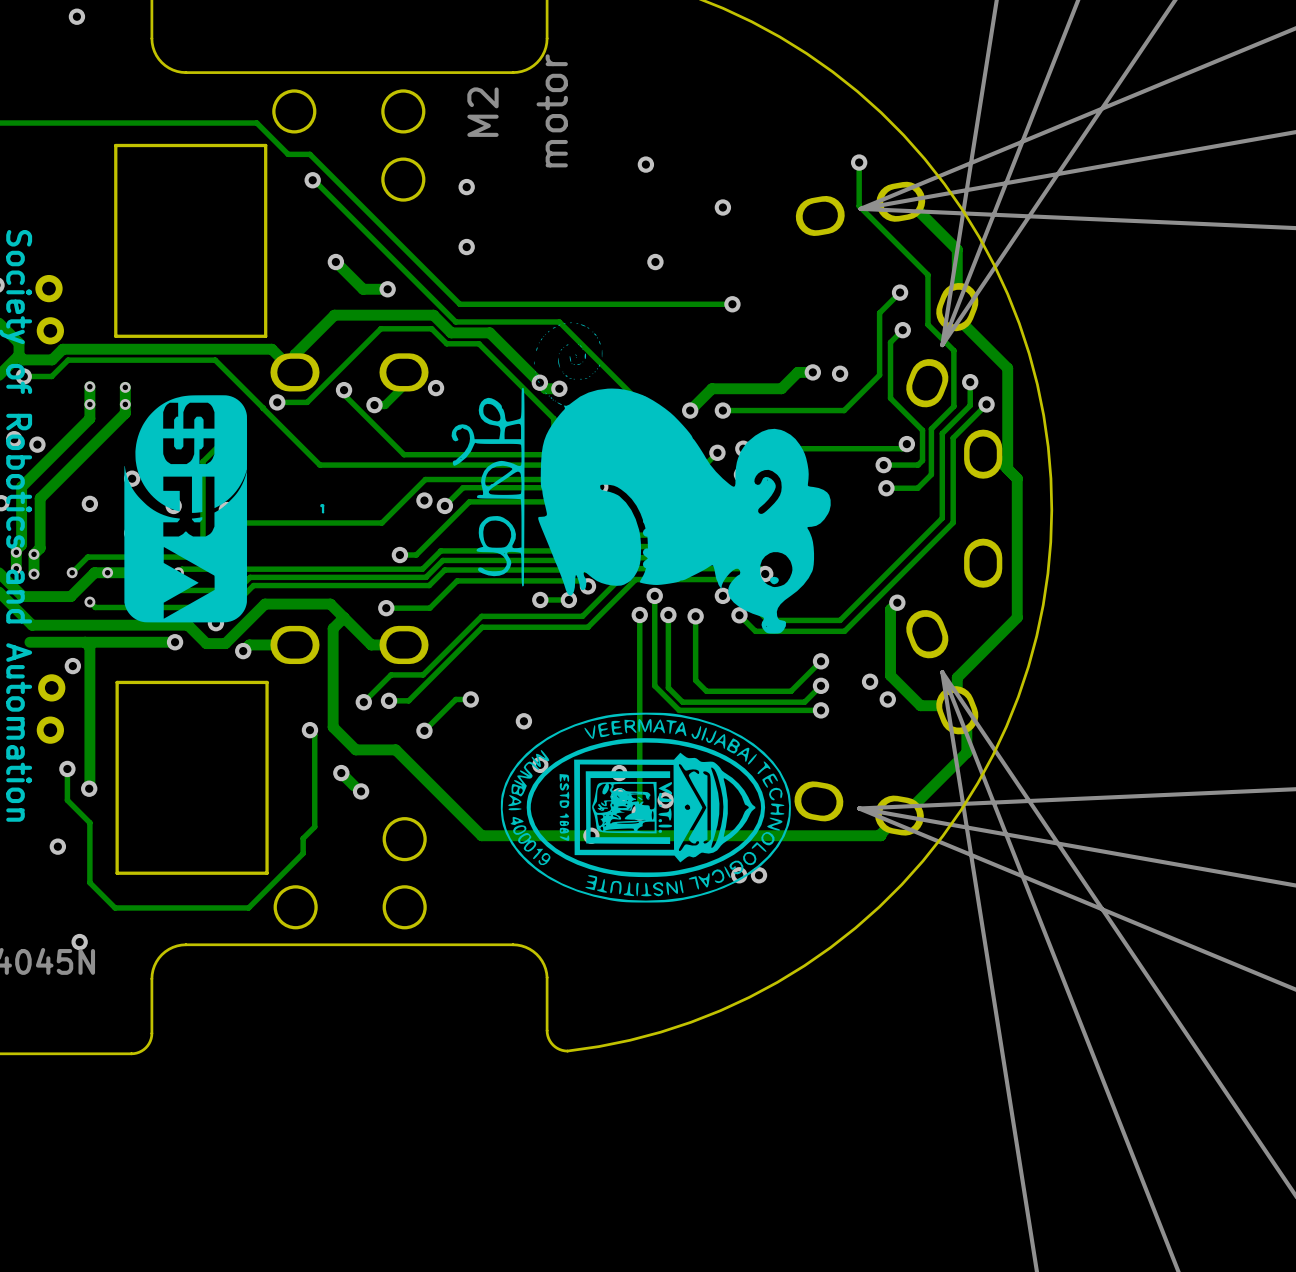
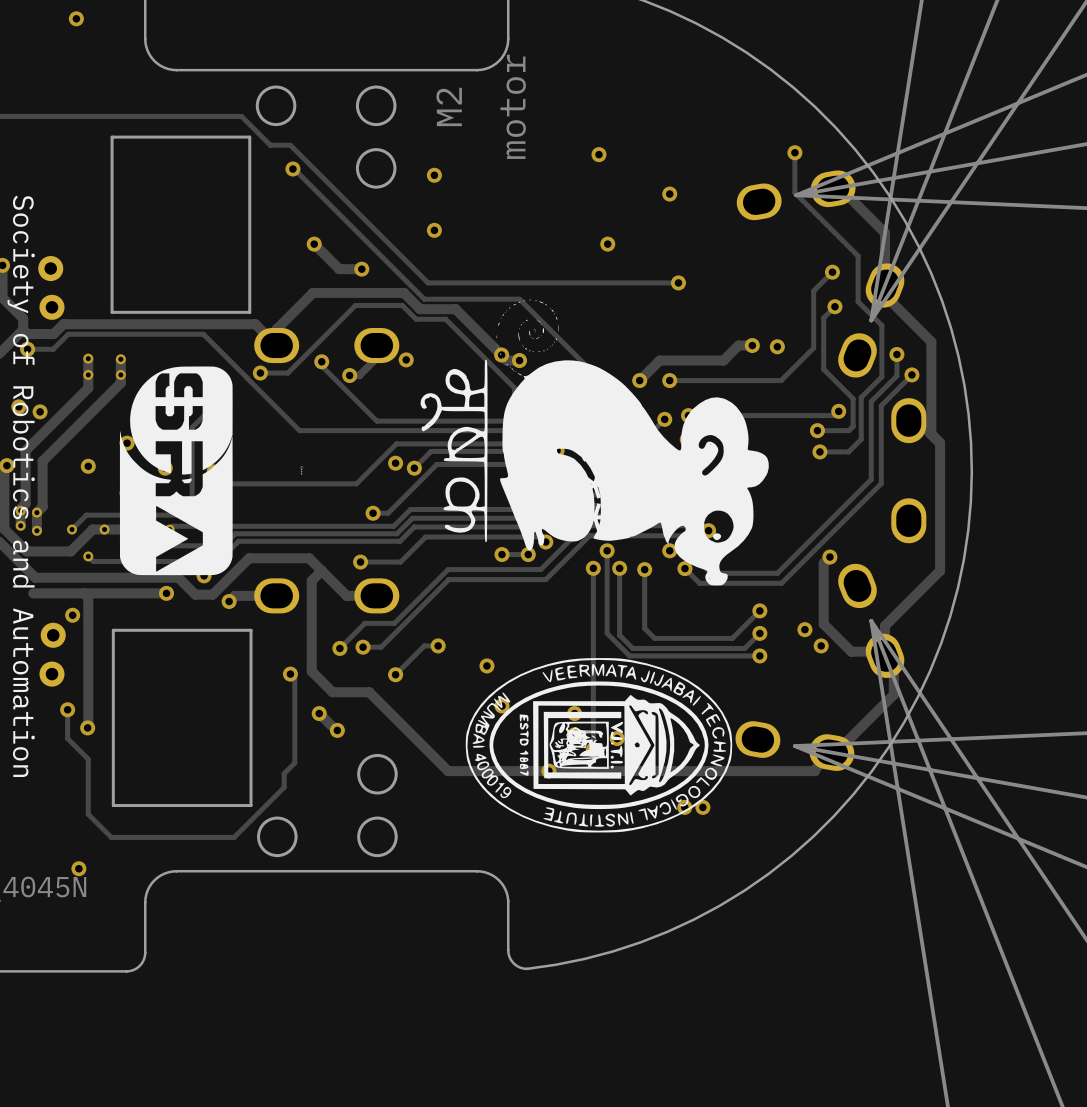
via: (57, 846) -> none

